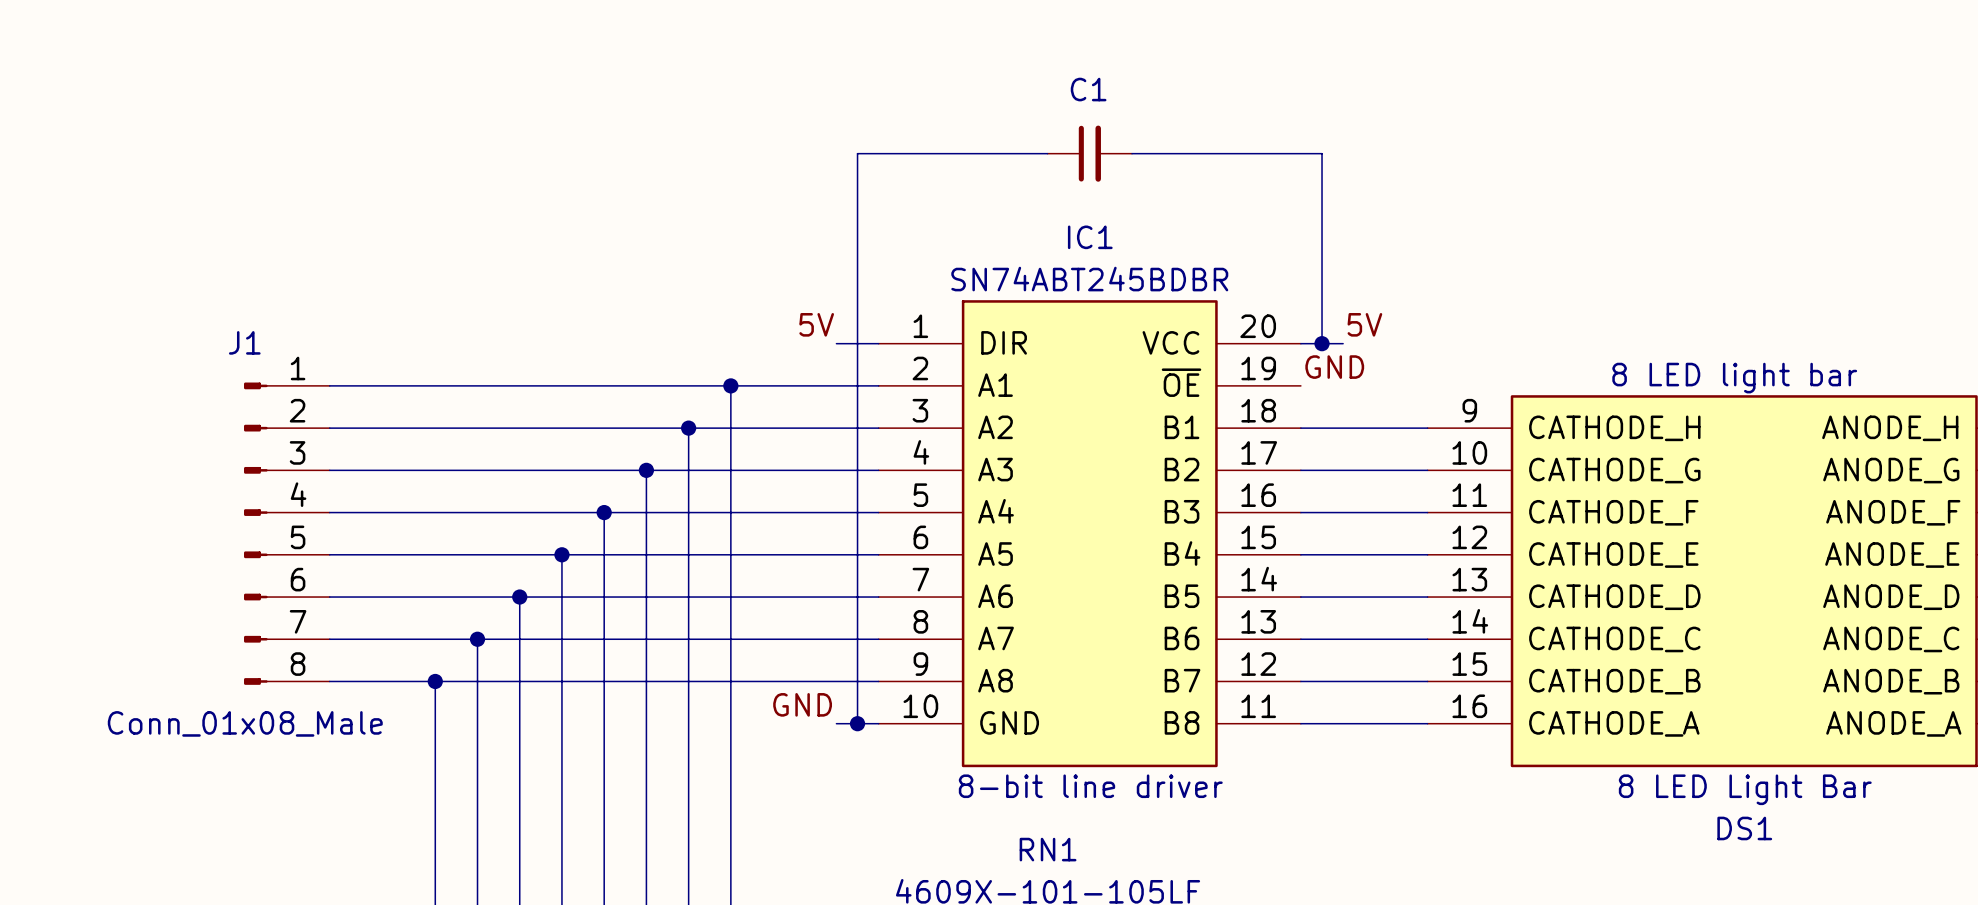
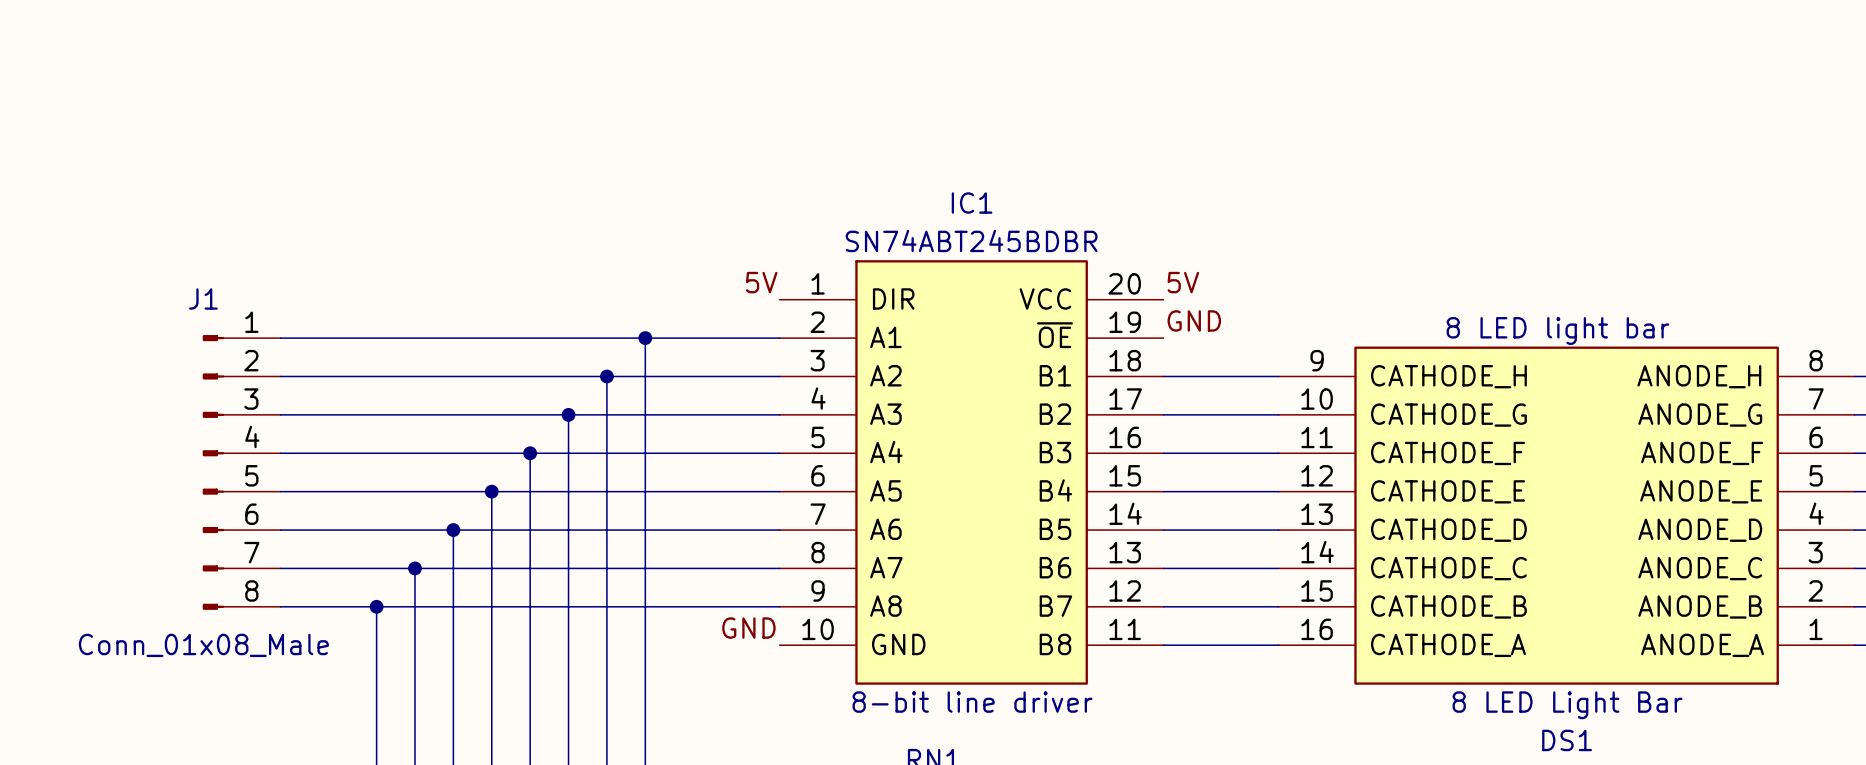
wire: (1047, 153) (857, 153) (857, 723) -> none
C1: (1089, 153) -> none
wire: (1132, 153) (1322, 153) (1322, 343) -> none
label position: 5V (816, 324) -> 5V (761, 282)
label position: 5V (1364, 324) -> 5V (1183, 282)
wire: (836, 343) (878, 343) -> none
wire: (1300, 343) (1343, 343) -> none
junction: (1322, 343) -> none
label position: GND (802, 704) -> GND (748, 628)
wire: (836, 723) (878, 723) -> none
junction: (857, 723) -> none

